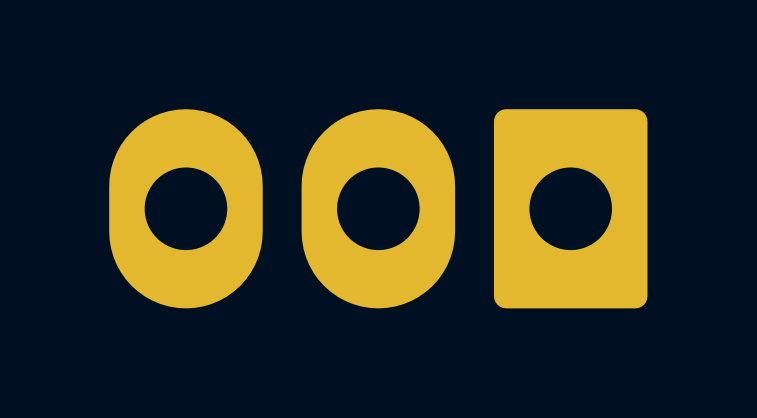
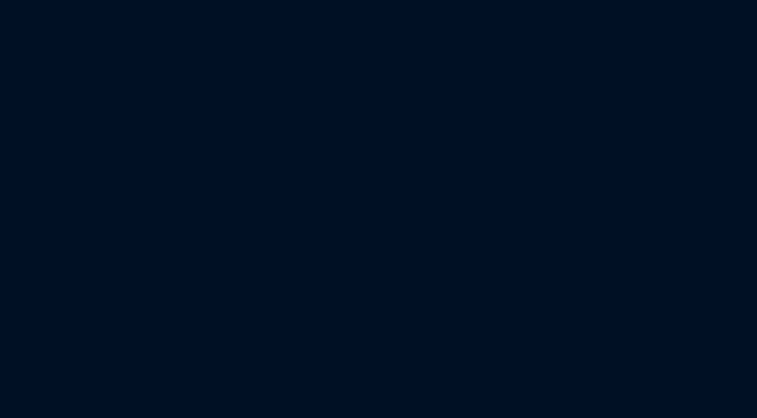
part: (378, 208) -> none

